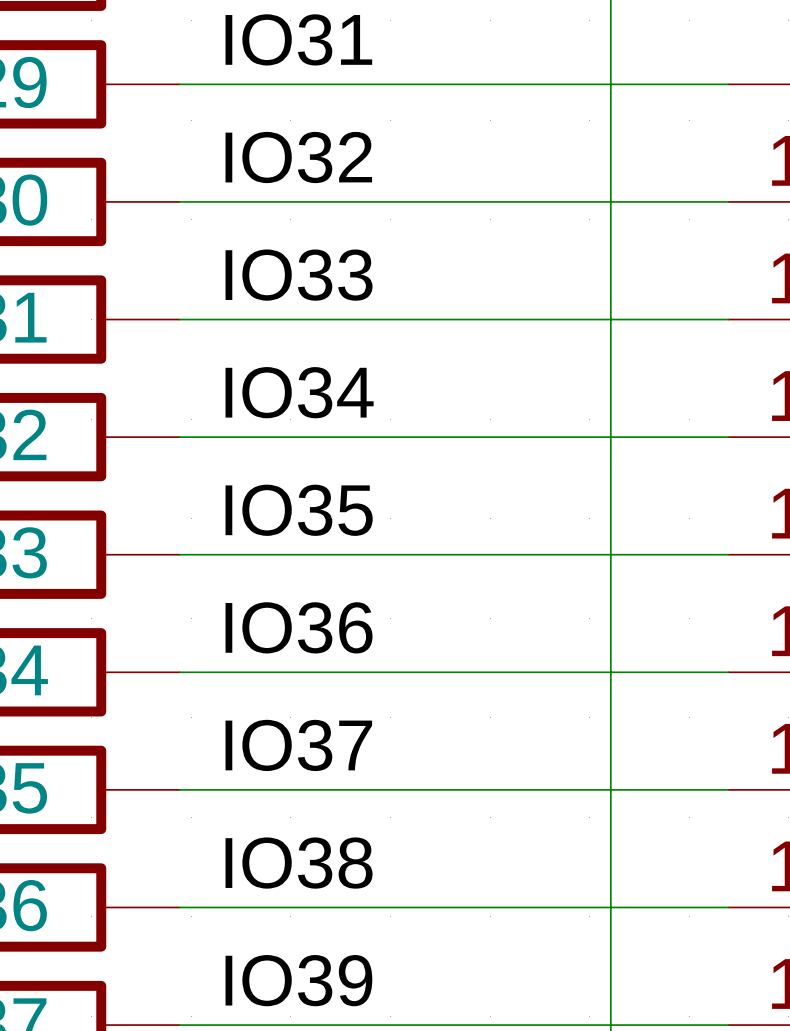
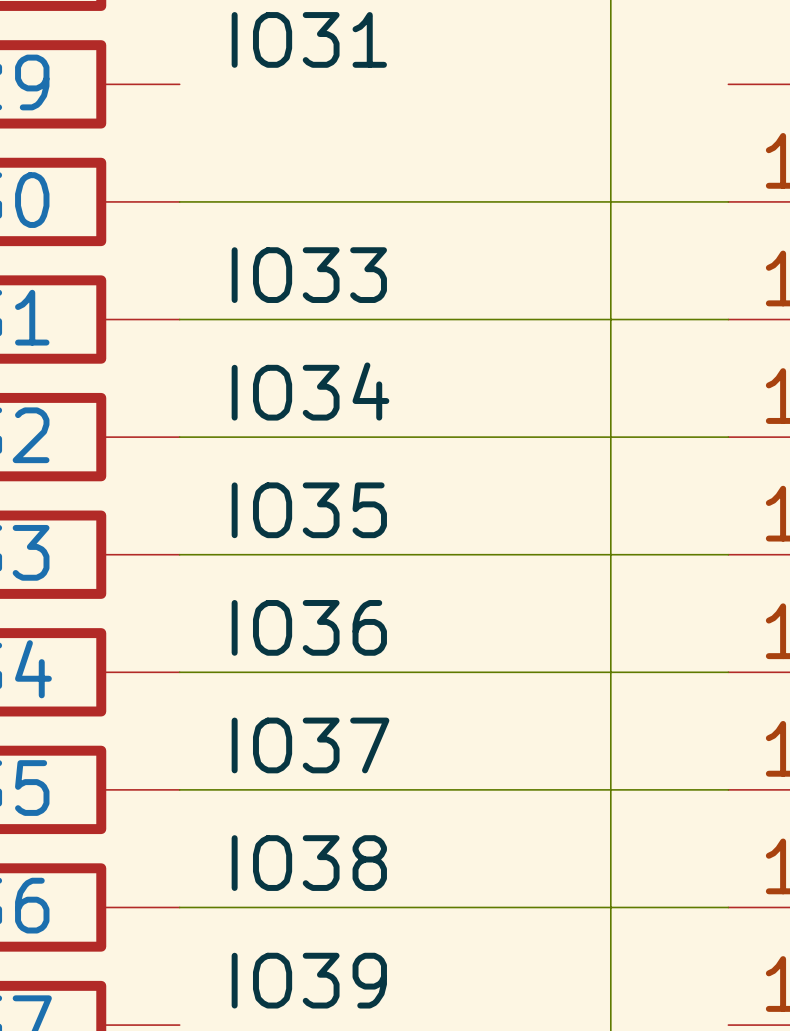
wire: (179, 84) (728, 84) -> none
label: IO32 (298, 157) -> none
wire: (179, 1025) (728, 1025) -> none

